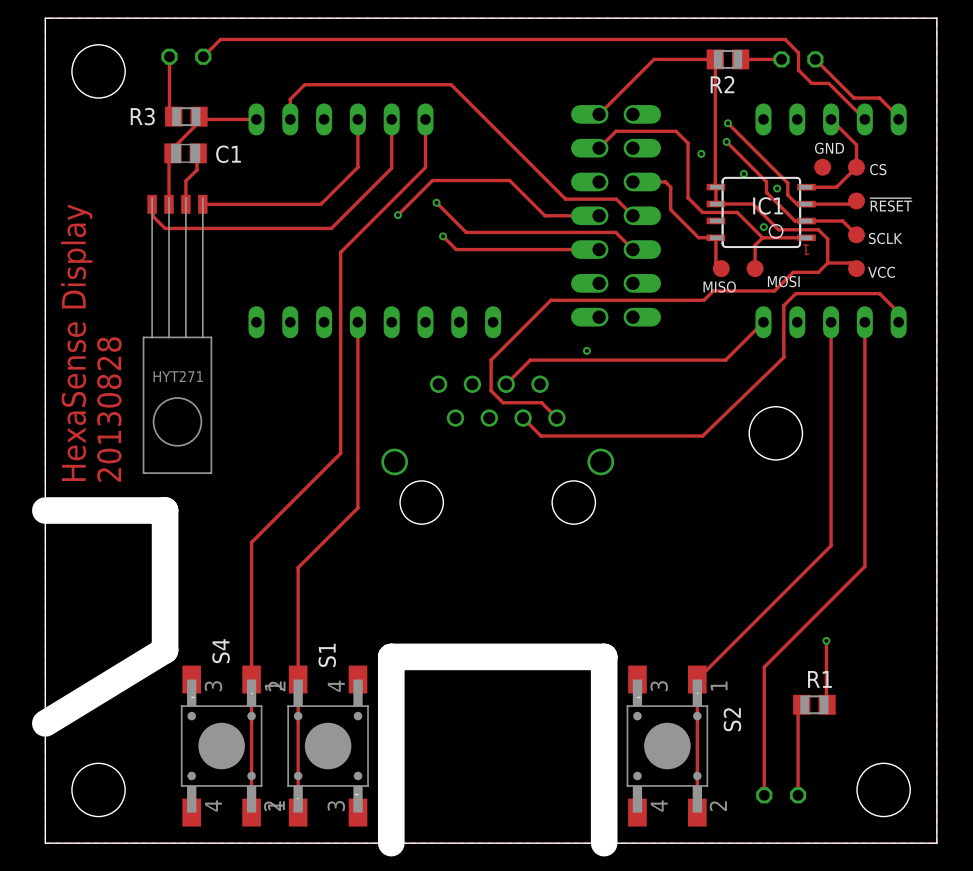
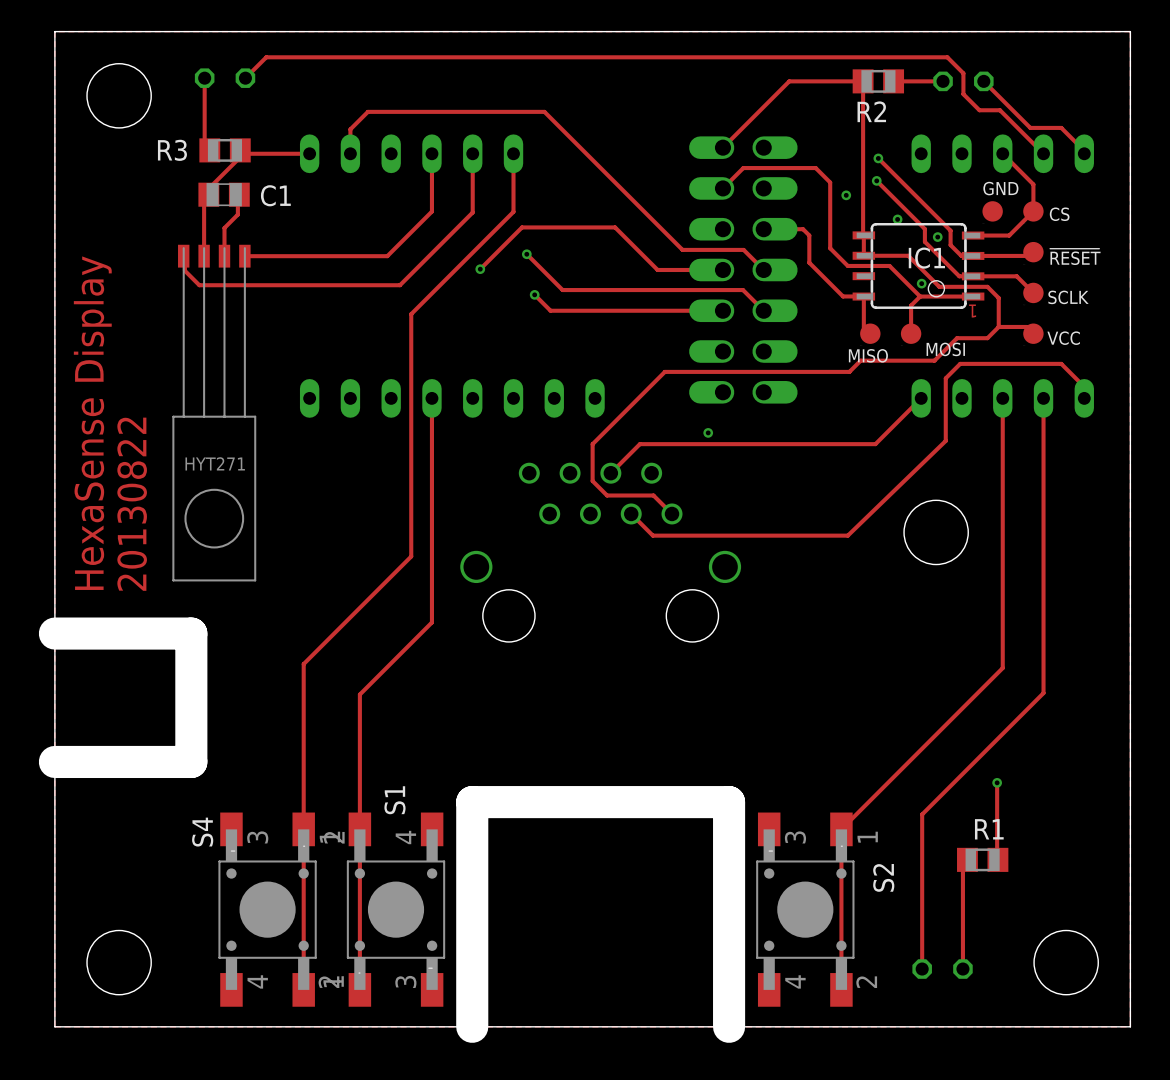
text: 20130828 (109, 409) -> 20130822 (132, 504)
board edge: (45, 510) (165, 510) (165, 650) (45, 723) -> none
board edge: none -> (54, 633) (191, 633) (191, 761) (54, 761)
S4 name position: S4 (221, 651) -> S4 (202, 832)

